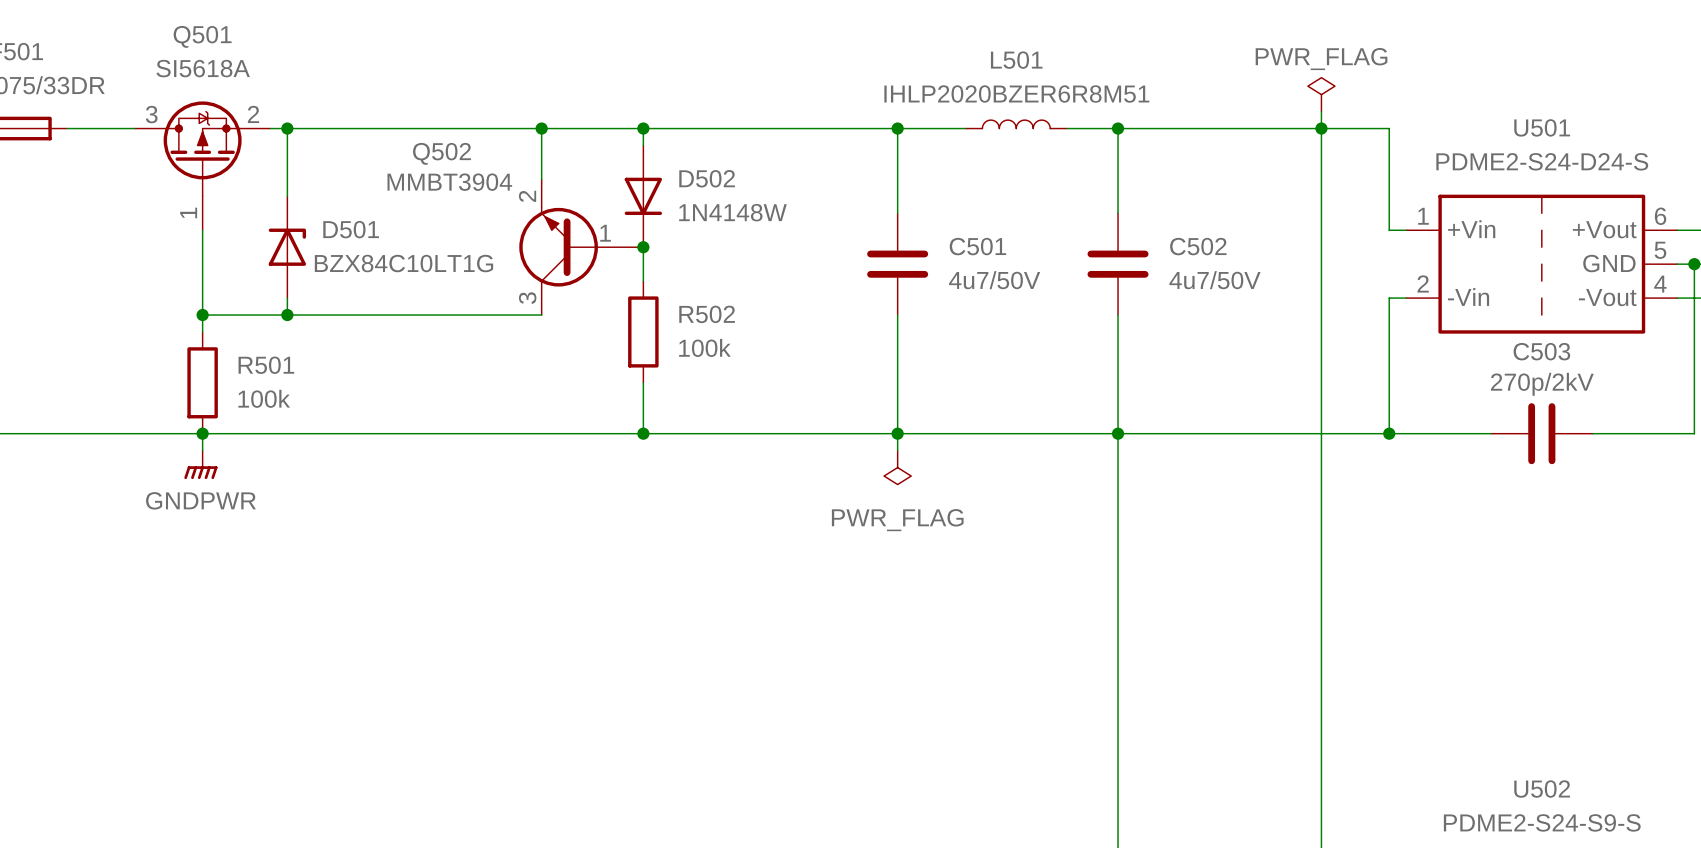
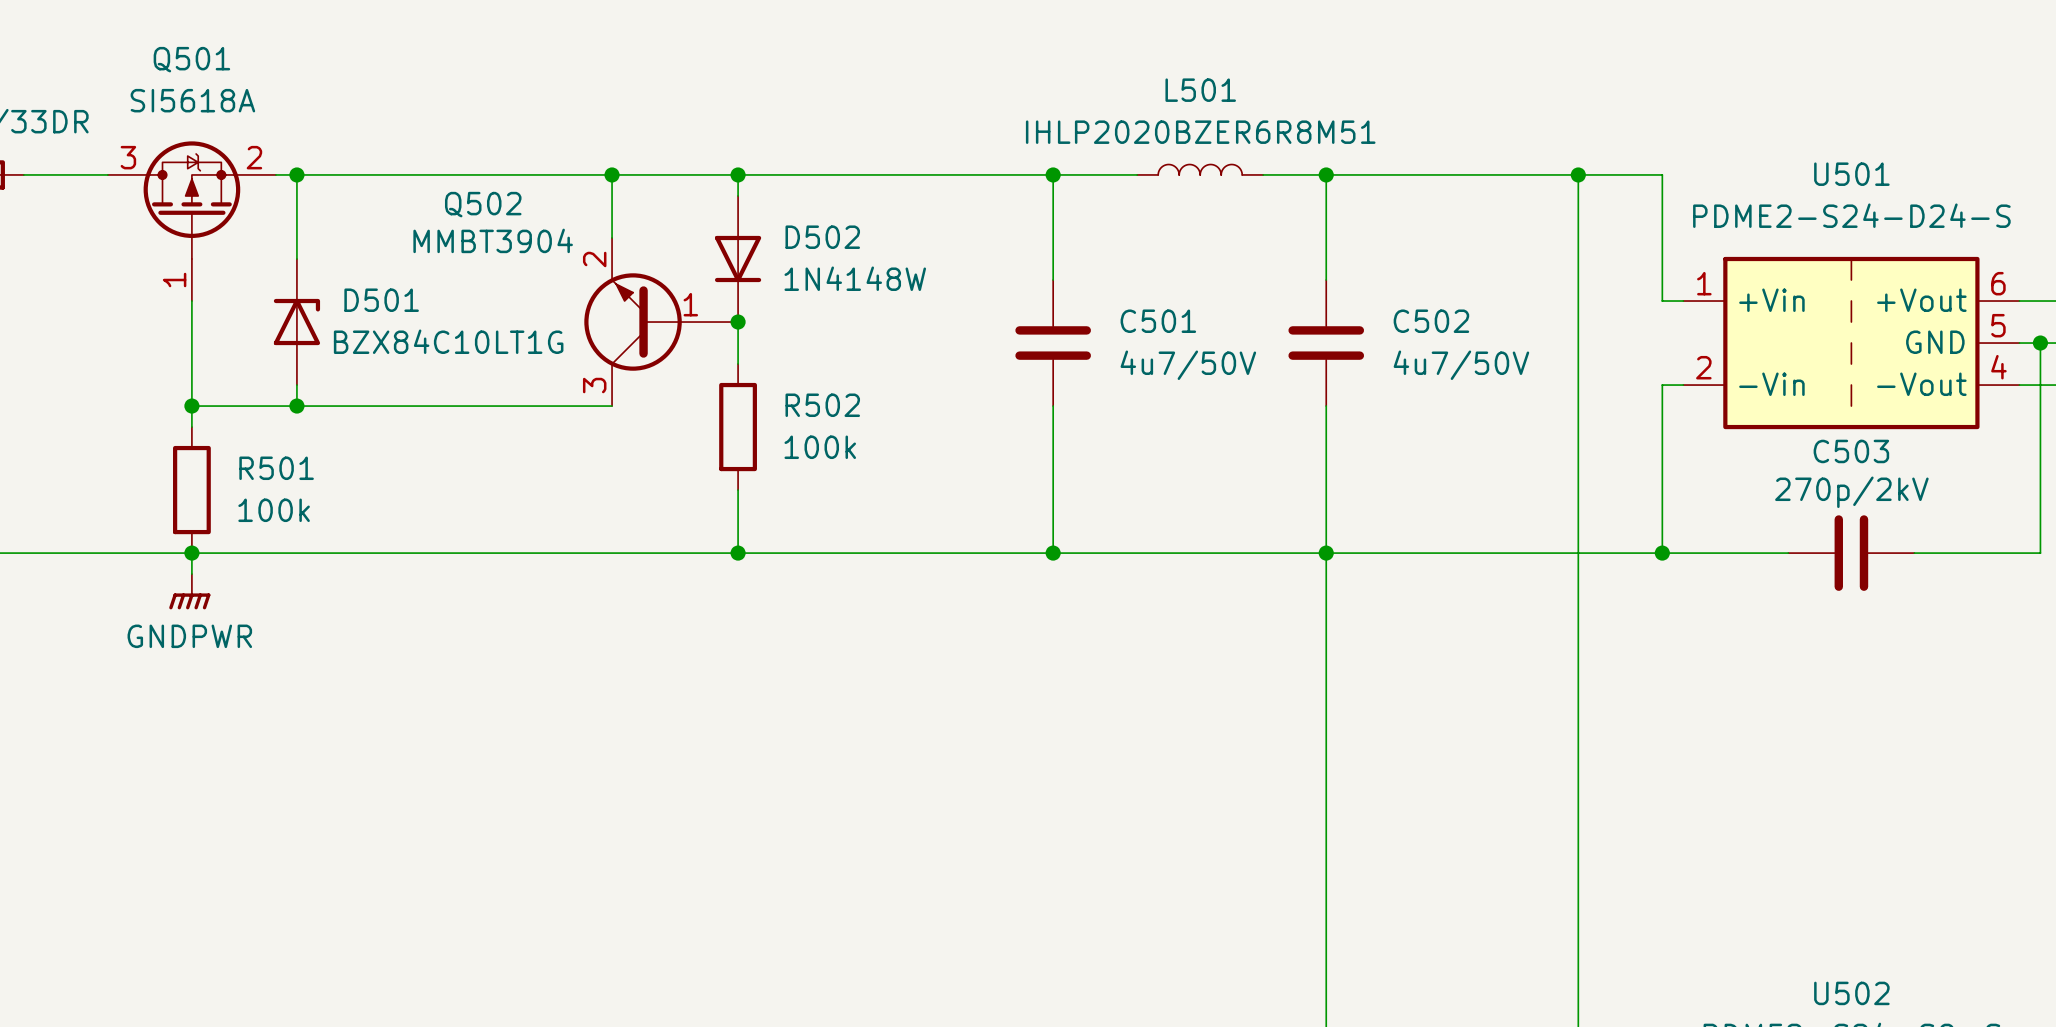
power symbol: PWR_FLAG (1321, 94) -> none
wire: (1321, 111) (1321, 128) -> none
wire: (897, 433) (897, 450) -> none
power symbol: PWR_FLAG (897, 467) -> none

